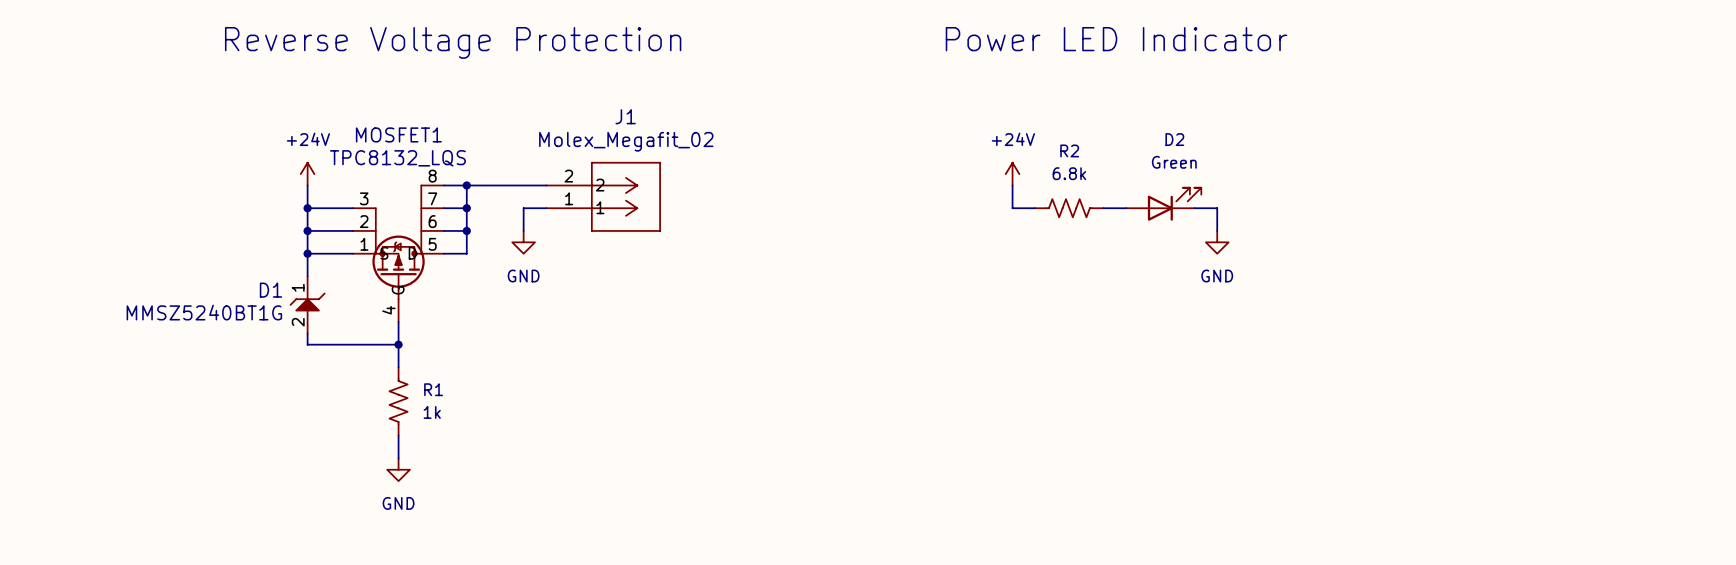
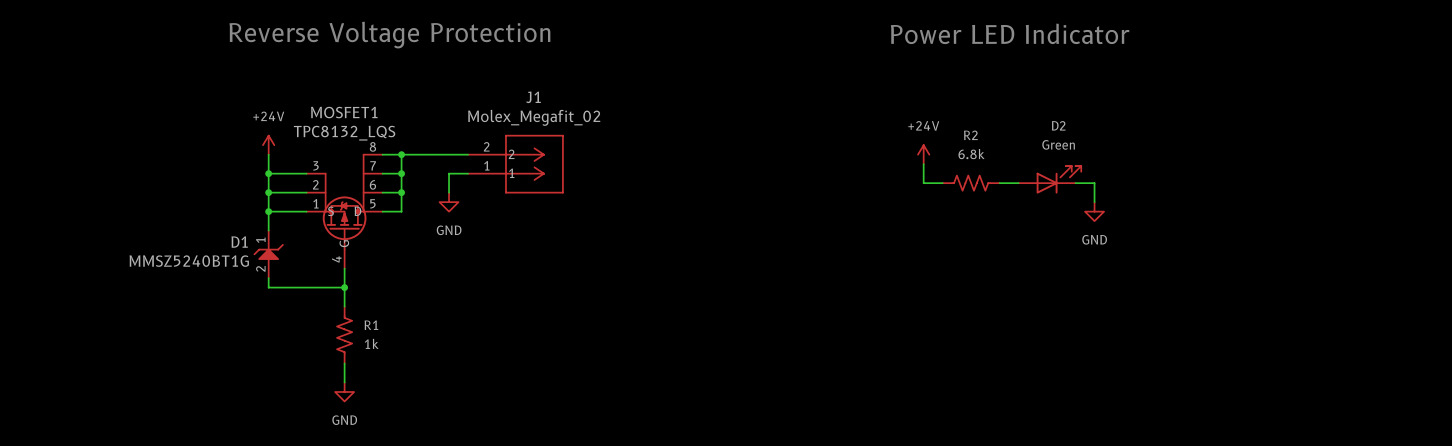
text position: Power LED Indicator (1116, 39) -> Power LED Indicator (1010, 33)
power symbol position: +24V (1012, 174) -> +24V (923, 154)
wire: (1012, 185) (1012, 208) (1035, 208) -> (923, 164) (923, 183) (942, 183)
D2 position: (1163, 204) -> (1049, 179)
R2 position: (1069, 208) -> (971, 183)
wire: (1103, 208) (1126, 208) -> (999, 183) (1018, 183)
wire: (1194, 208) (1217, 208) (1217, 230) -> (1075, 183) (1094, 183) (1094, 202)
power symbol position: GND (1217, 242) -> GND (1094, 211)

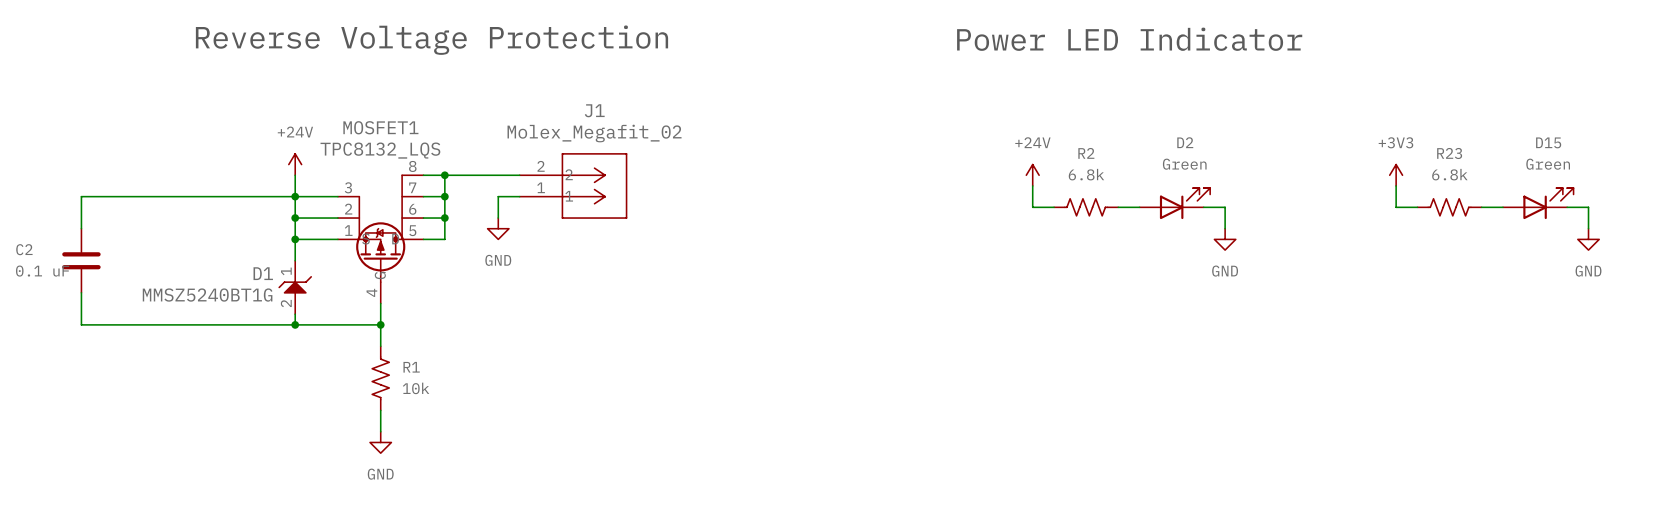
power symbol: none -> +3V3 (1396, 175)
wire: none -> (1396, 185) (1396, 207) (1417, 207)
wire: none -> (295, 196) (81, 196) (81, 228)
D15: none -> Green (1538, 203)
R23: none -> 6.8k (1449, 207)
wire: none -> (1481, 207) (1503, 207)
wire: none -> (1567, 207) (1588, 207) (1588, 228)
power symbol: none -> GND (1588, 239)
C2: none -> 0.1 uF (81, 260)
wire: none -> (81, 292) (81, 324) (295, 324)
junction: none -> (295, 324)
R1 value: 1k (371, 343) -> 10k (416, 388)

